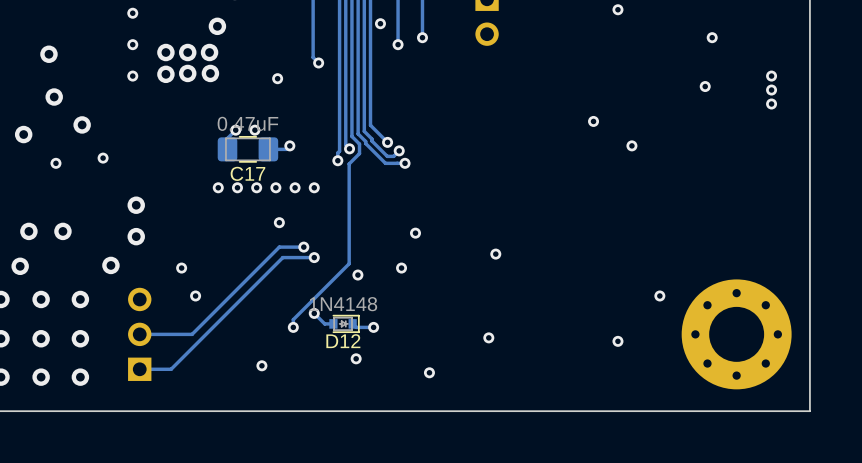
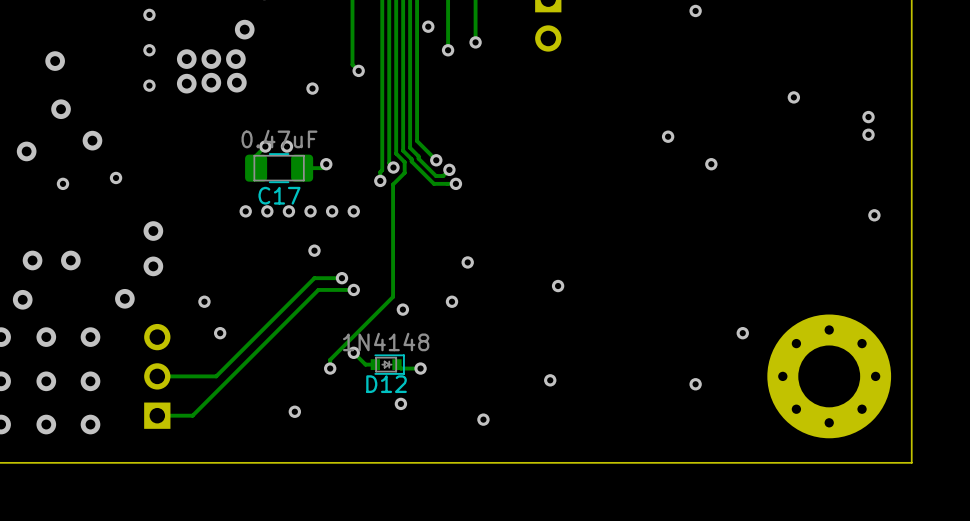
via: (712, 37) -> none
via: (771, 76) -> none
via: (771, 90) -> none
via: none -> (868, 134)
via: none -> (874, 215)

